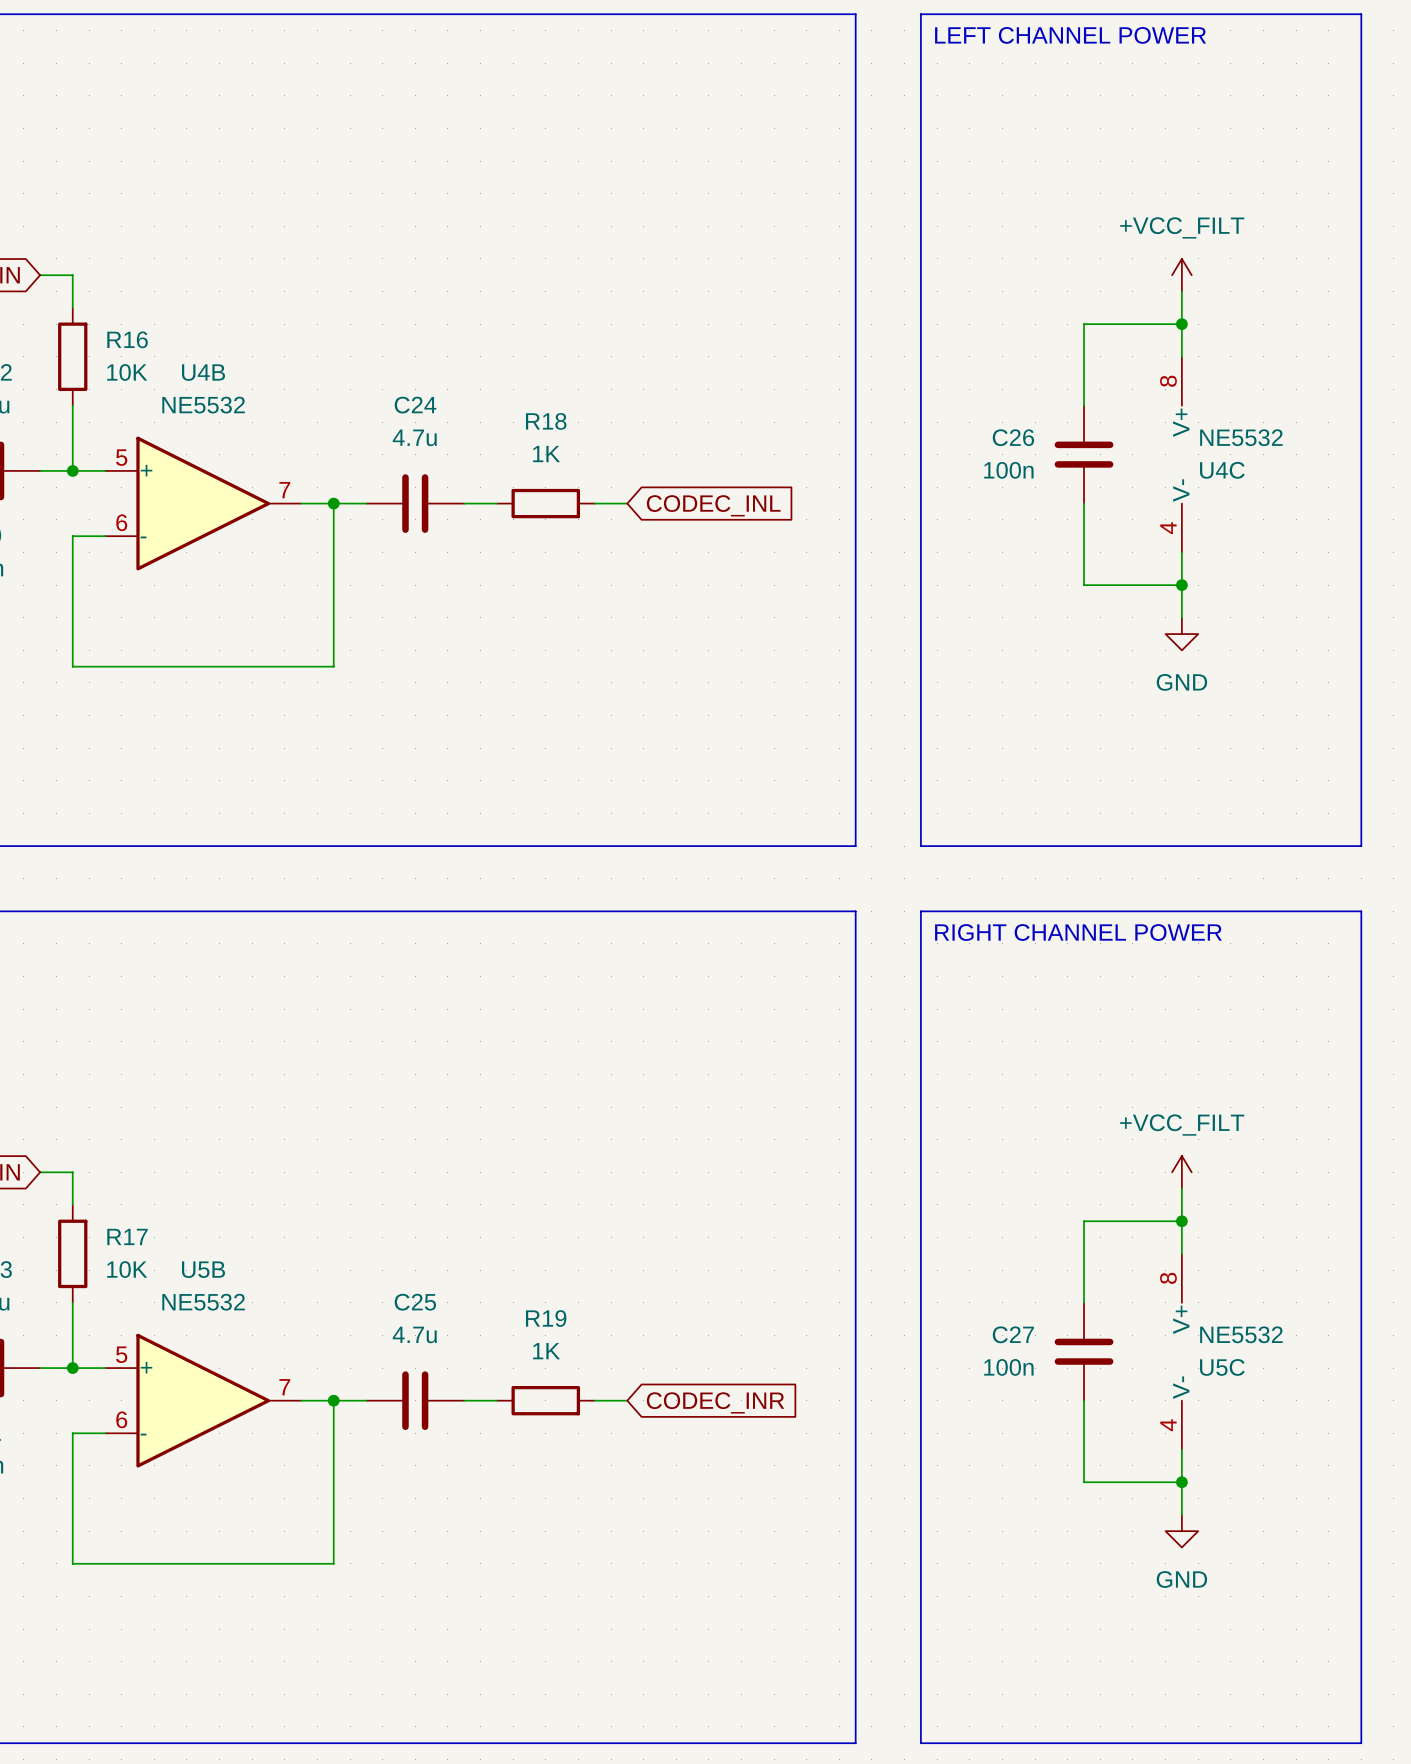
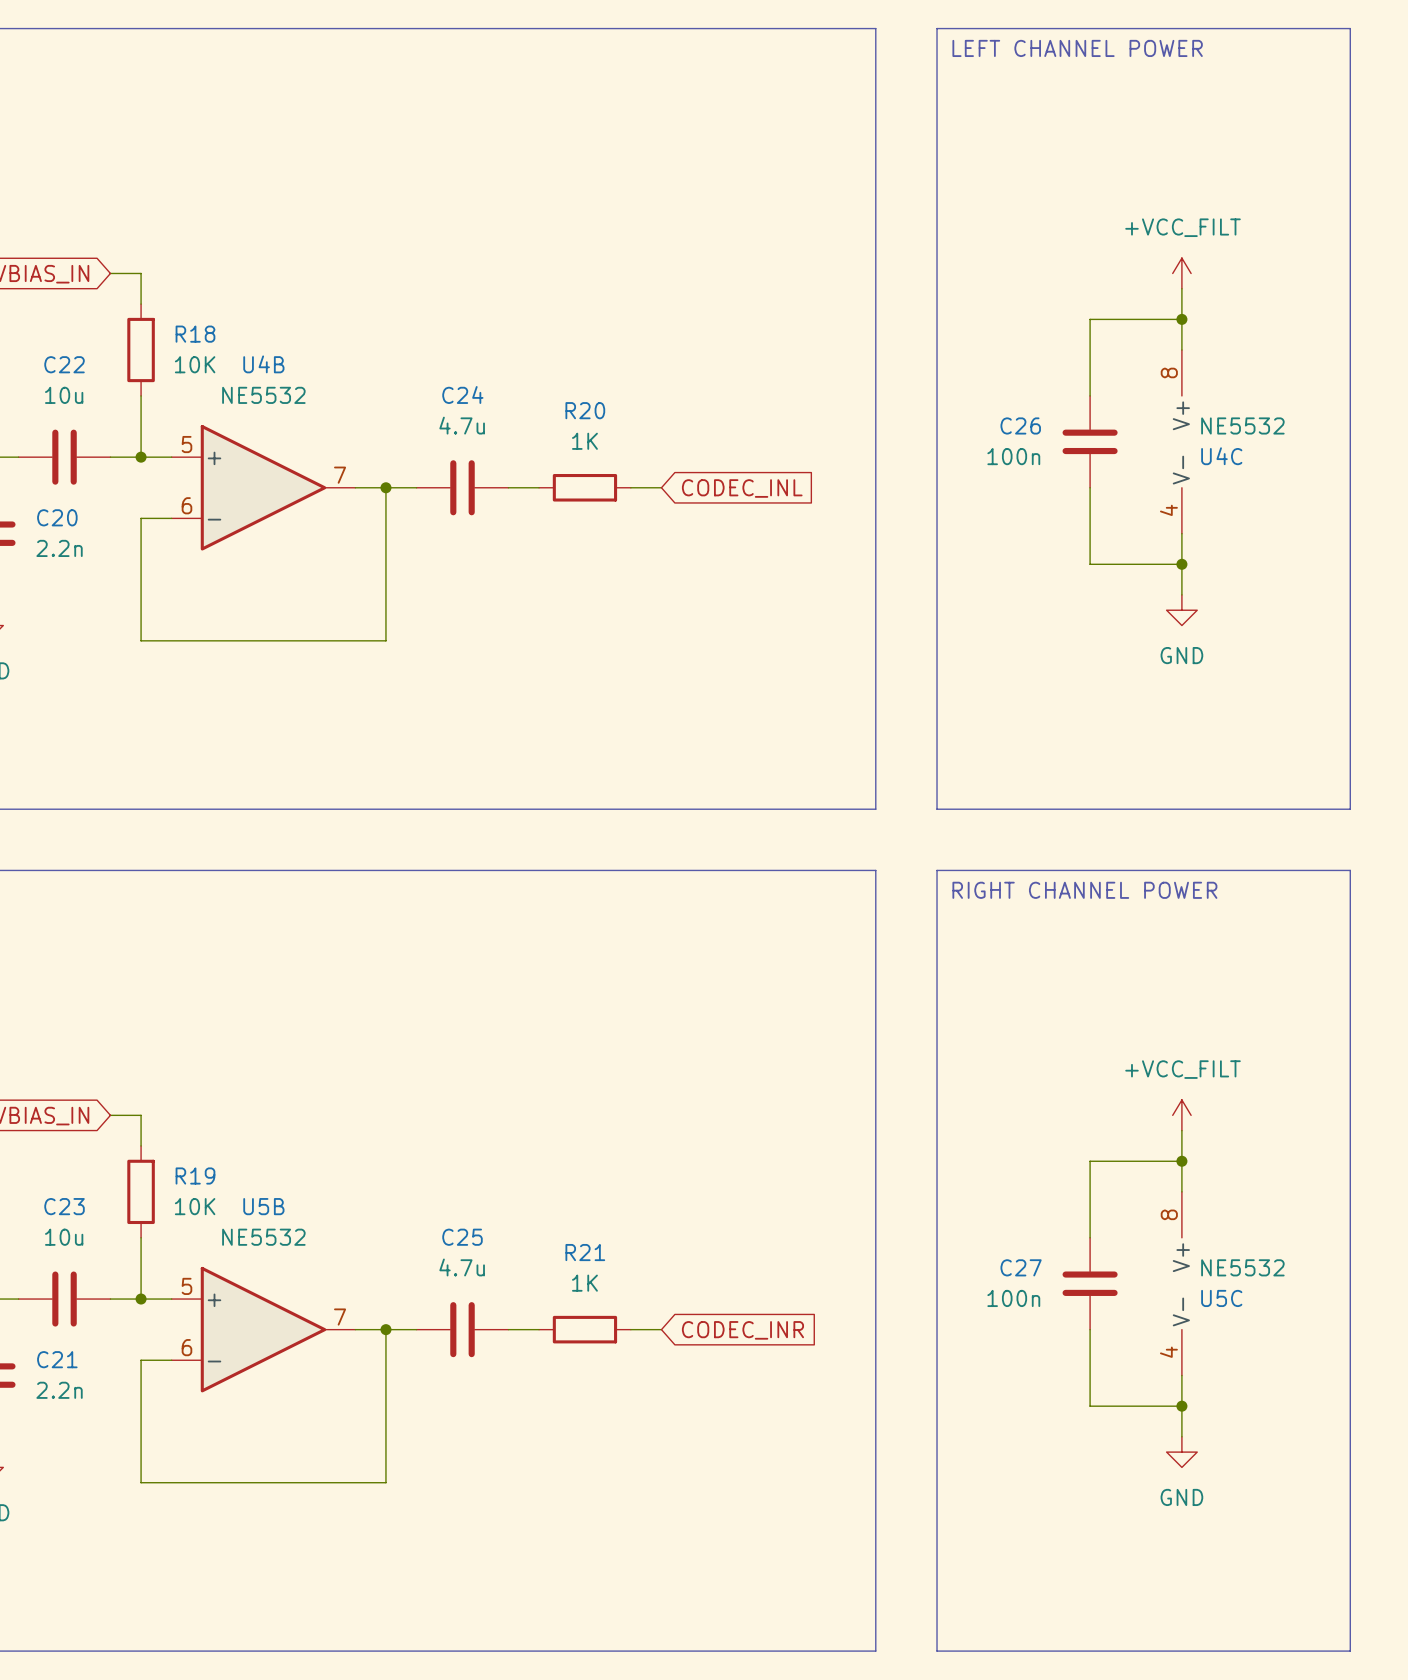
R16 name: R16 (127, 339) -> R18 (195, 334)
R18 name: R18 (546, 421) -> R20 (585, 410)
R17 name: R17 (127, 1236) -> R19 (195, 1176)
R19 name: R19 (546, 1318) -> R21 (585, 1252)

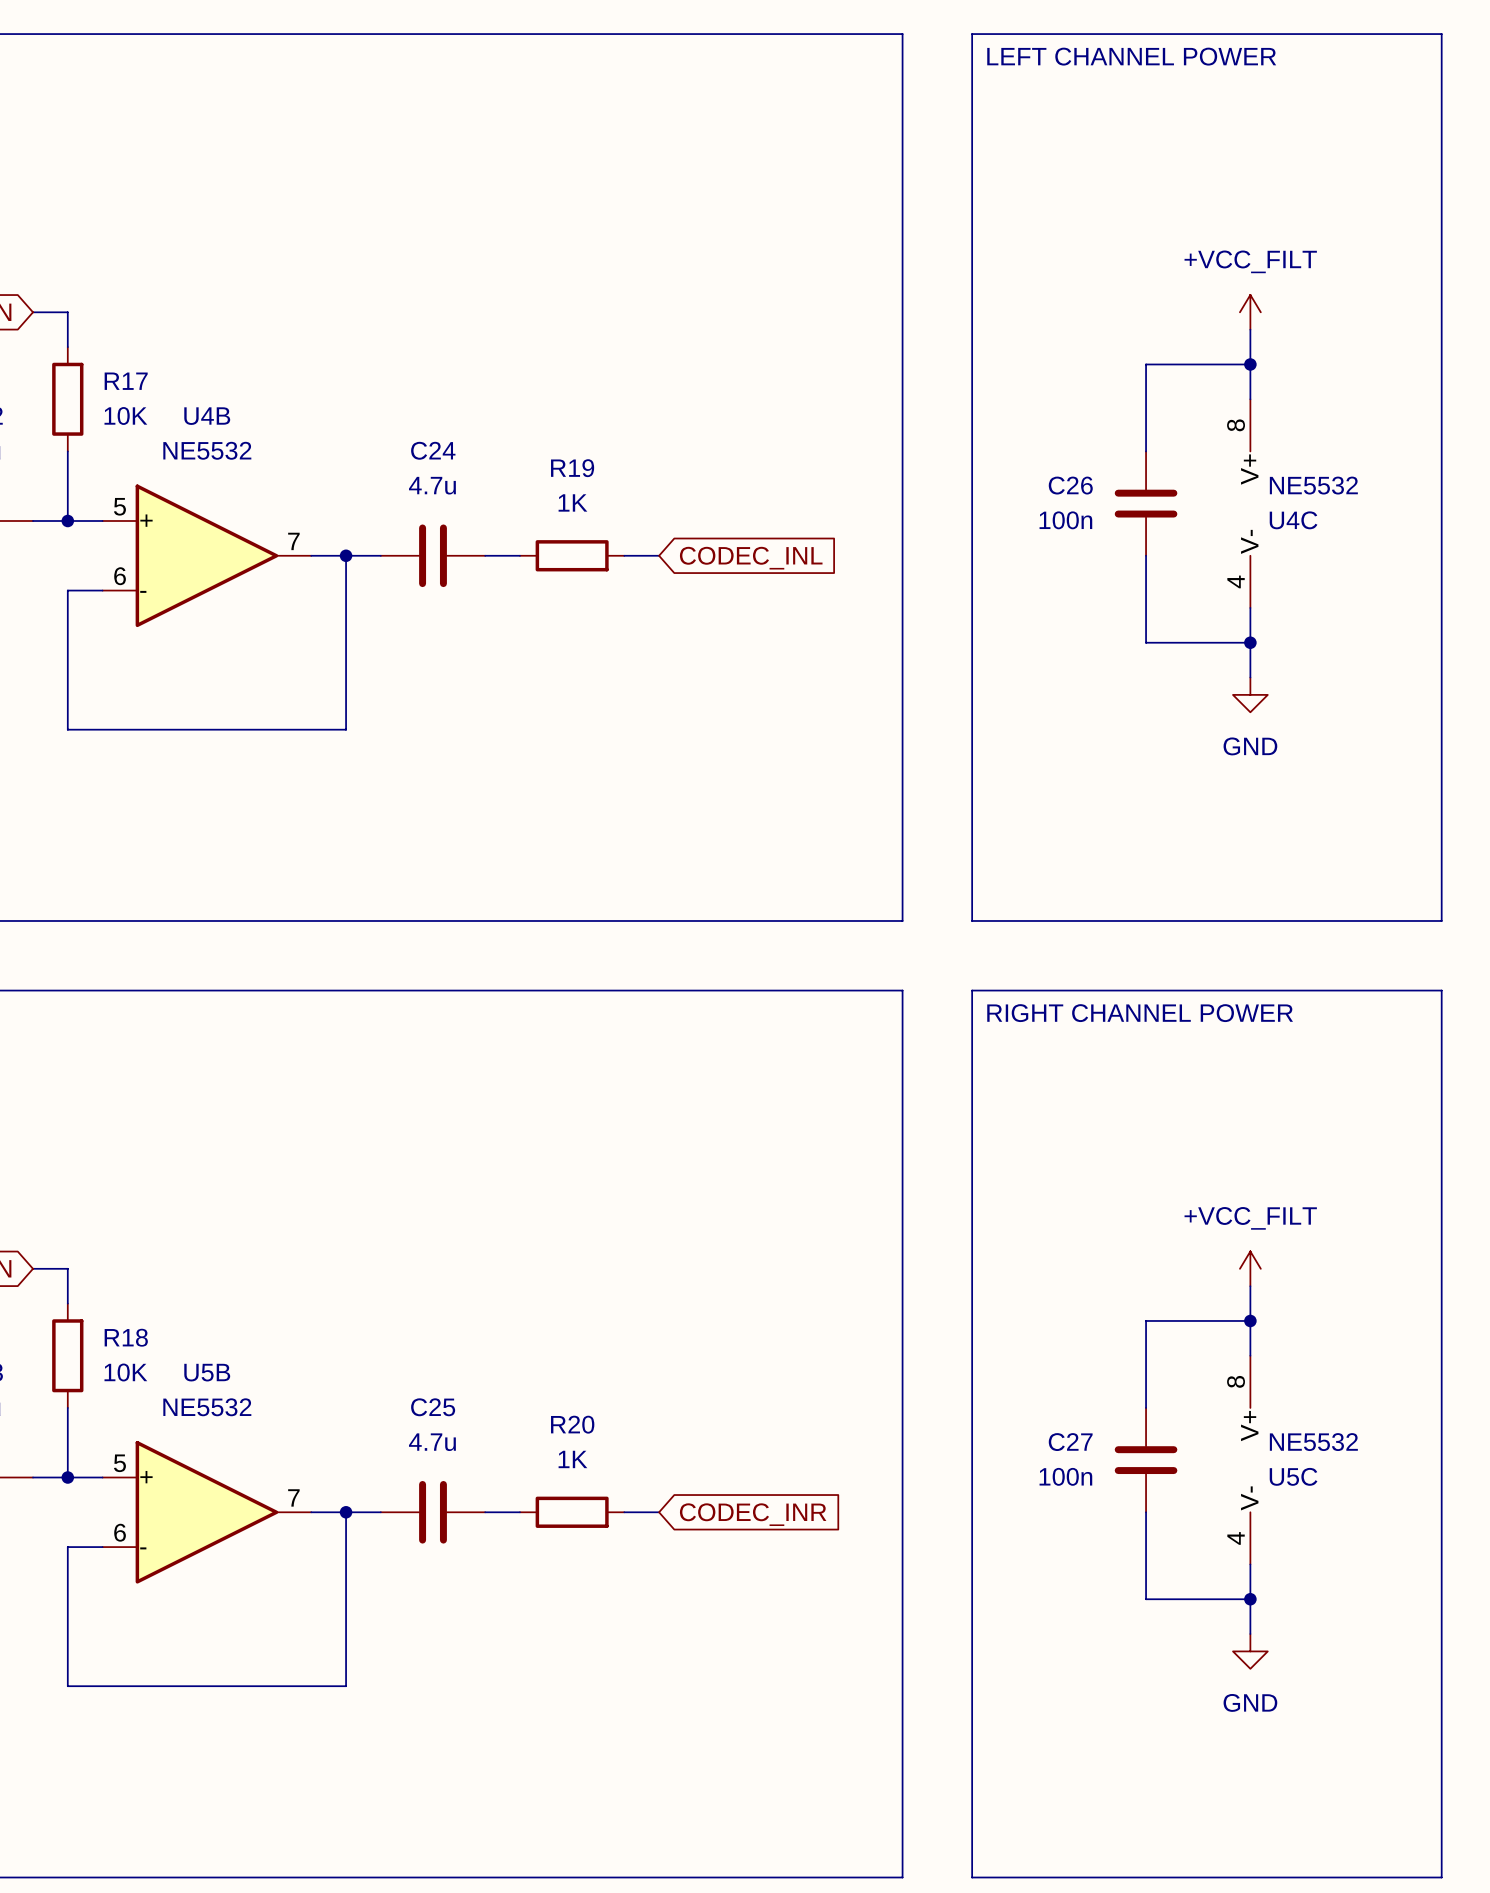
R18 name: R18 (195, 334) -> R17 (126, 381)
R20 name: R20 (585, 410) -> R19 (572, 468)
R19 name: R19 (195, 1176) -> R18 (126, 1337)
R21 name: R21 (585, 1252) -> R20 (572, 1424)

